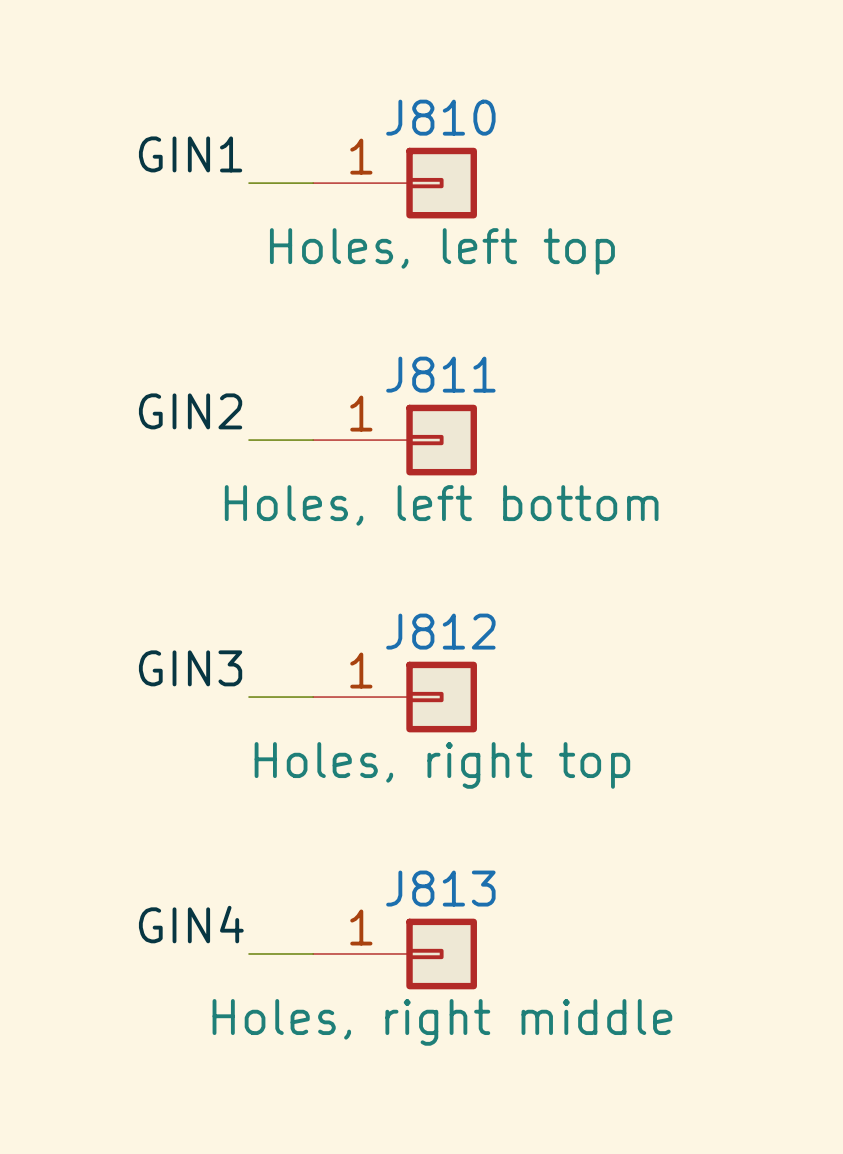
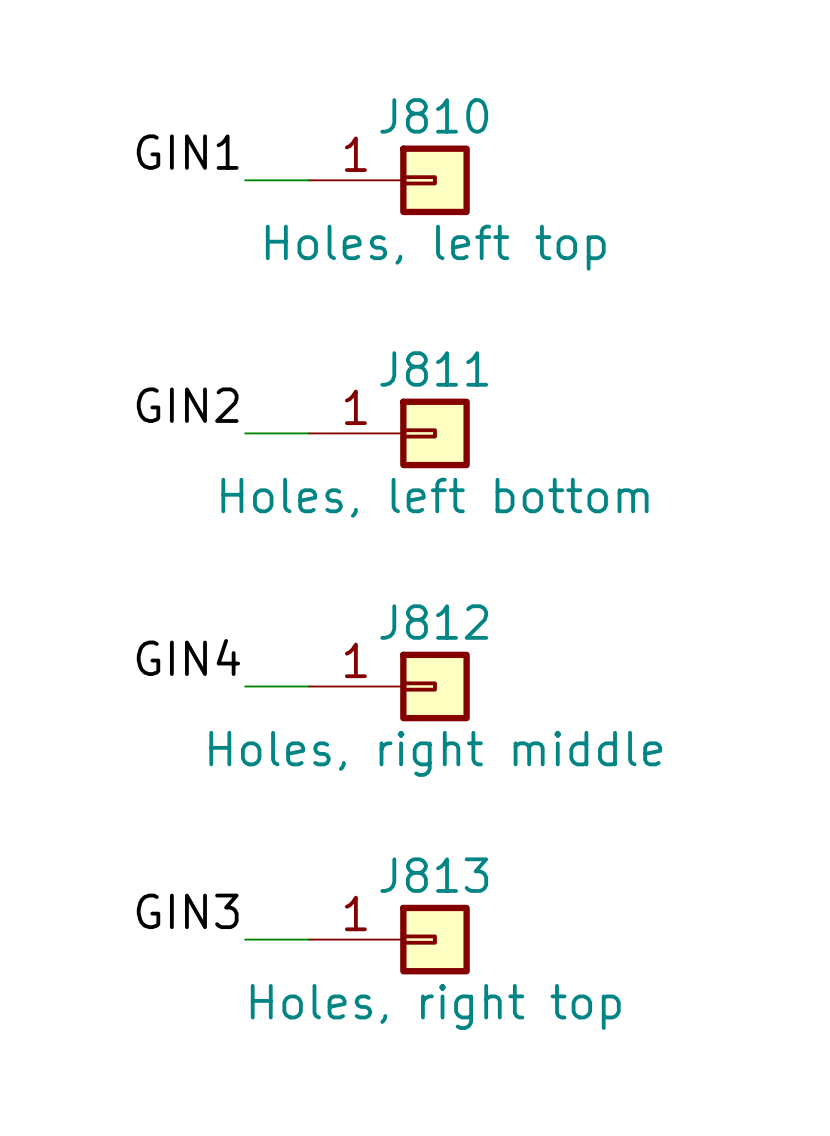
label: GIN3 (190, 668) -> GIN4 (188, 657)
J812 value: Holes, right top (442, 765) -> Holes, right middle (435, 753)
label: GIN4 (191, 924) -> GIN3 (187, 911)
J813 value: Holes, right middle (442, 1022) -> Holes, right top (435, 1006)

